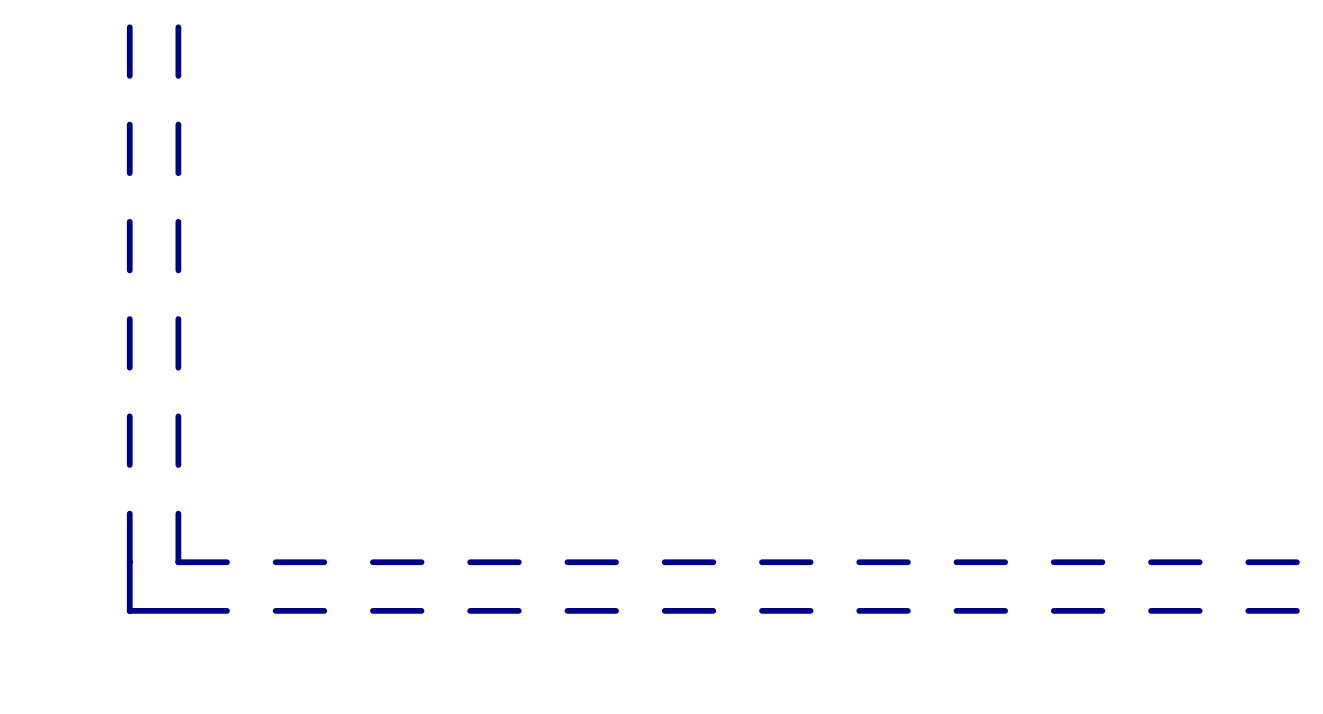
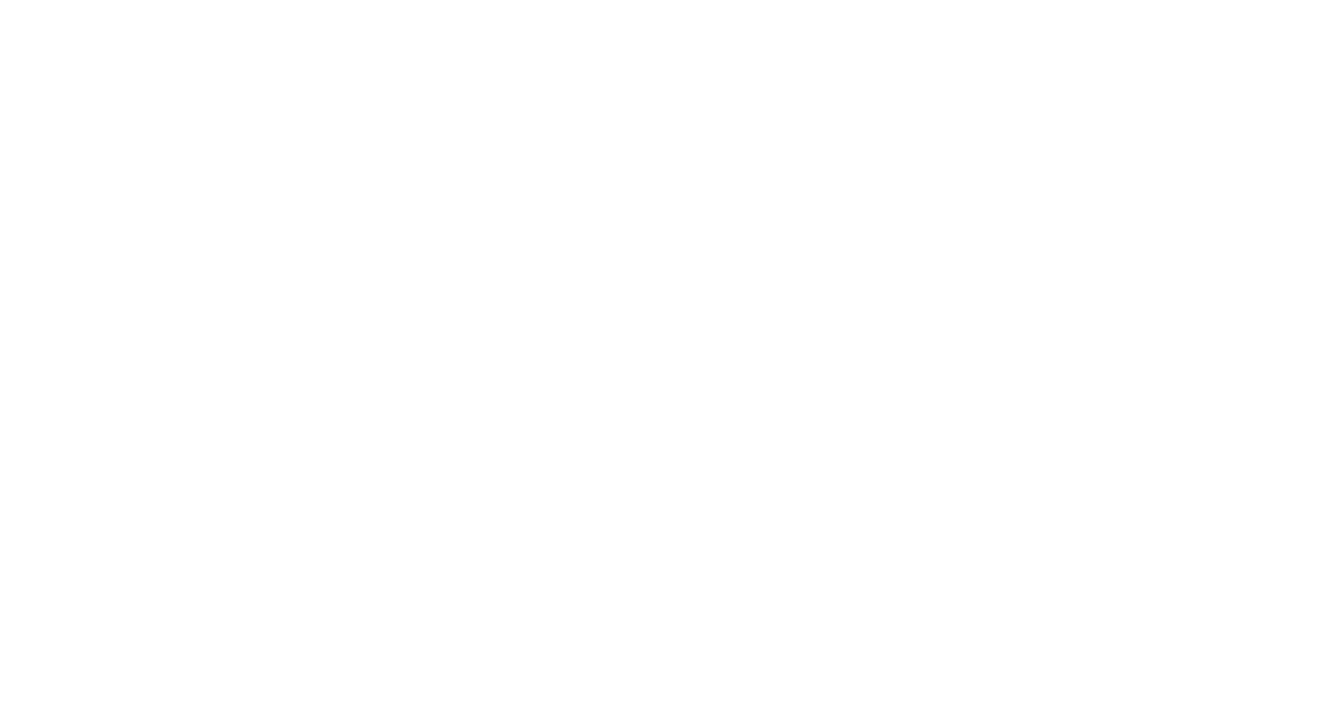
line: (129, 27) (129, 75) -> none
line: (178, 27) (178, 75) -> none
line: (129, 124) (129, 173) -> none
line: (178, 124) (178, 173) -> none
line: (129, 221) (129, 270) -> none
line: (178, 221) (178, 270) -> none
line: (129, 319) (129, 367) -> none
line: (178, 319) (178, 367) -> none
line: (129, 416) (129, 464) -> none
line: (178, 416) (178, 464) -> none
line: (129, 513) (129, 610) (227, 610) -> none
line: (178, 513) (178, 562) (227, 562) -> none
line: (275, 562) (324, 562) -> none
line: (372, 562) (421, 562) -> none
line: (470, 562) (518, 562) -> none
line: (567, 562) (616, 562) -> none
line: (664, 562) (713, 562) -> none
line: (761, 562) (810, 562) -> none
line: (859, 562) (907, 562) -> none
line: (956, 562) (1005, 562) -> none
line: (1053, 562) (1102, 562) -> none
line: (1151, 562) (1199, 562) -> none
line: (1248, 562) (1296, 562) -> none
line: (275, 610) (324, 610) -> none
line: (372, 610) (421, 610) -> none
line: (470, 610) (518, 610) -> none
line: (567, 610) (616, 610) -> none
line: (664, 610) (713, 610) -> none
line: (761, 610) (810, 610) -> none
line: (859, 610) (907, 610) -> none
line: (956, 610) (1005, 610) -> none
line: (1053, 610) (1102, 610) -> none
line: (1151, 610) (1199, 610) -> none
line: (1248, 610) (1296, 610) -> none

